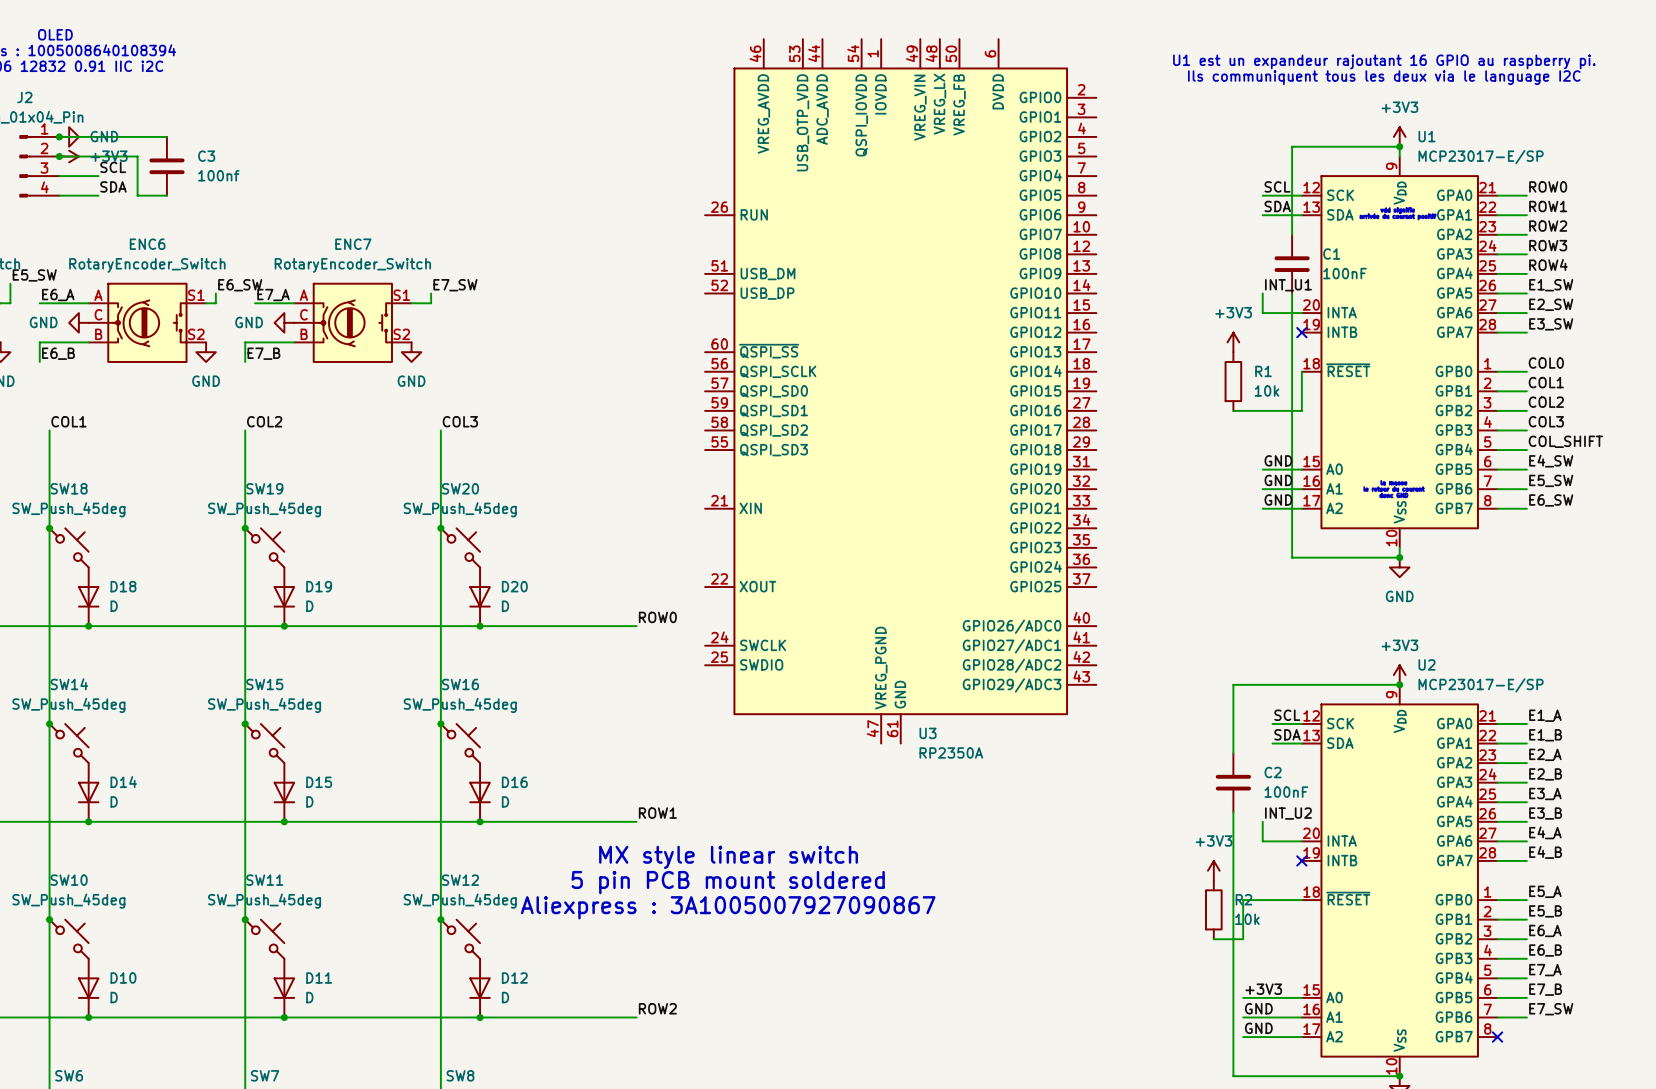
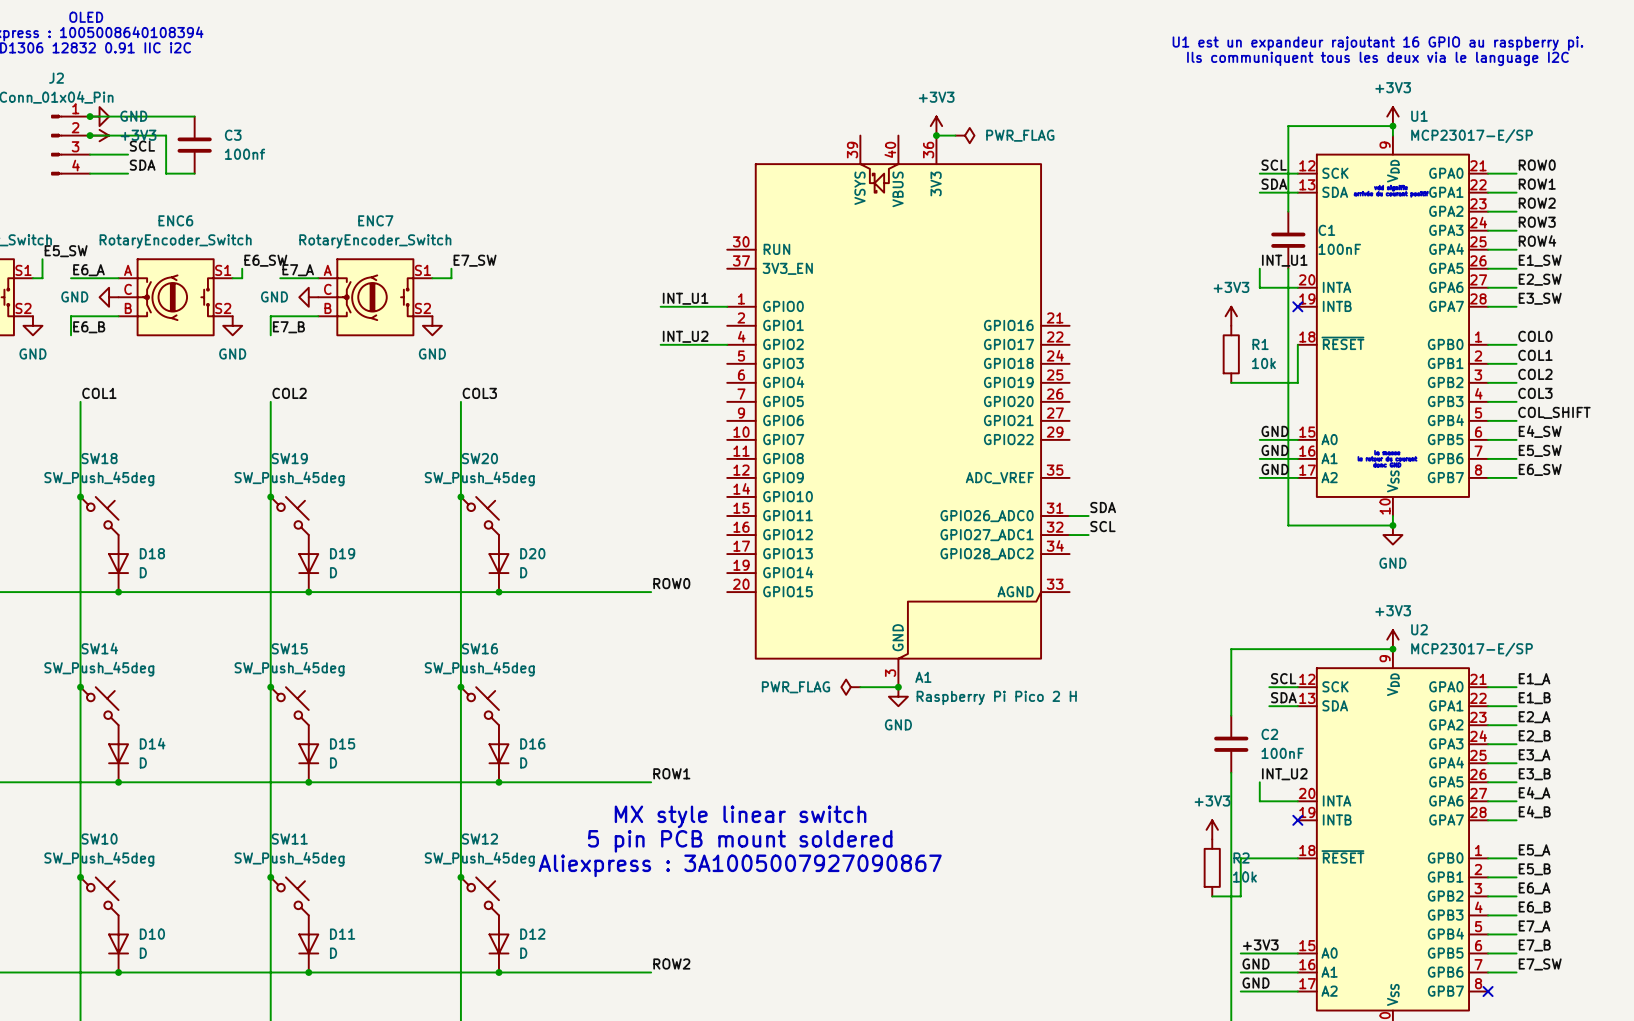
power symbol: none -> +3V3 (936, 126)
junction: none -> (936, 135)
power symbol: none -> PWR_FLAG (964, 135)
label: none -> INT_U1 (685, 298)
wire: none -> (660, 306) (727, 306)
label: none -> INT_U2 (685, 336)
wire: none -> (660, 344) (727, 344)
U3: RP2350A (900, 391) -> none
A1: none -> Raspberry Pi Pico 2 H (898, 411)
label: none -> SDA (1103, 507)
label: none -> SCL (1102, 526)
power symbol: none -> PWR_FLAG (850, 687)
wire: none -> (860, 687) (898, 687)
junction: none -> (898, 687)
power symbol: none -> GND (898, 696)

